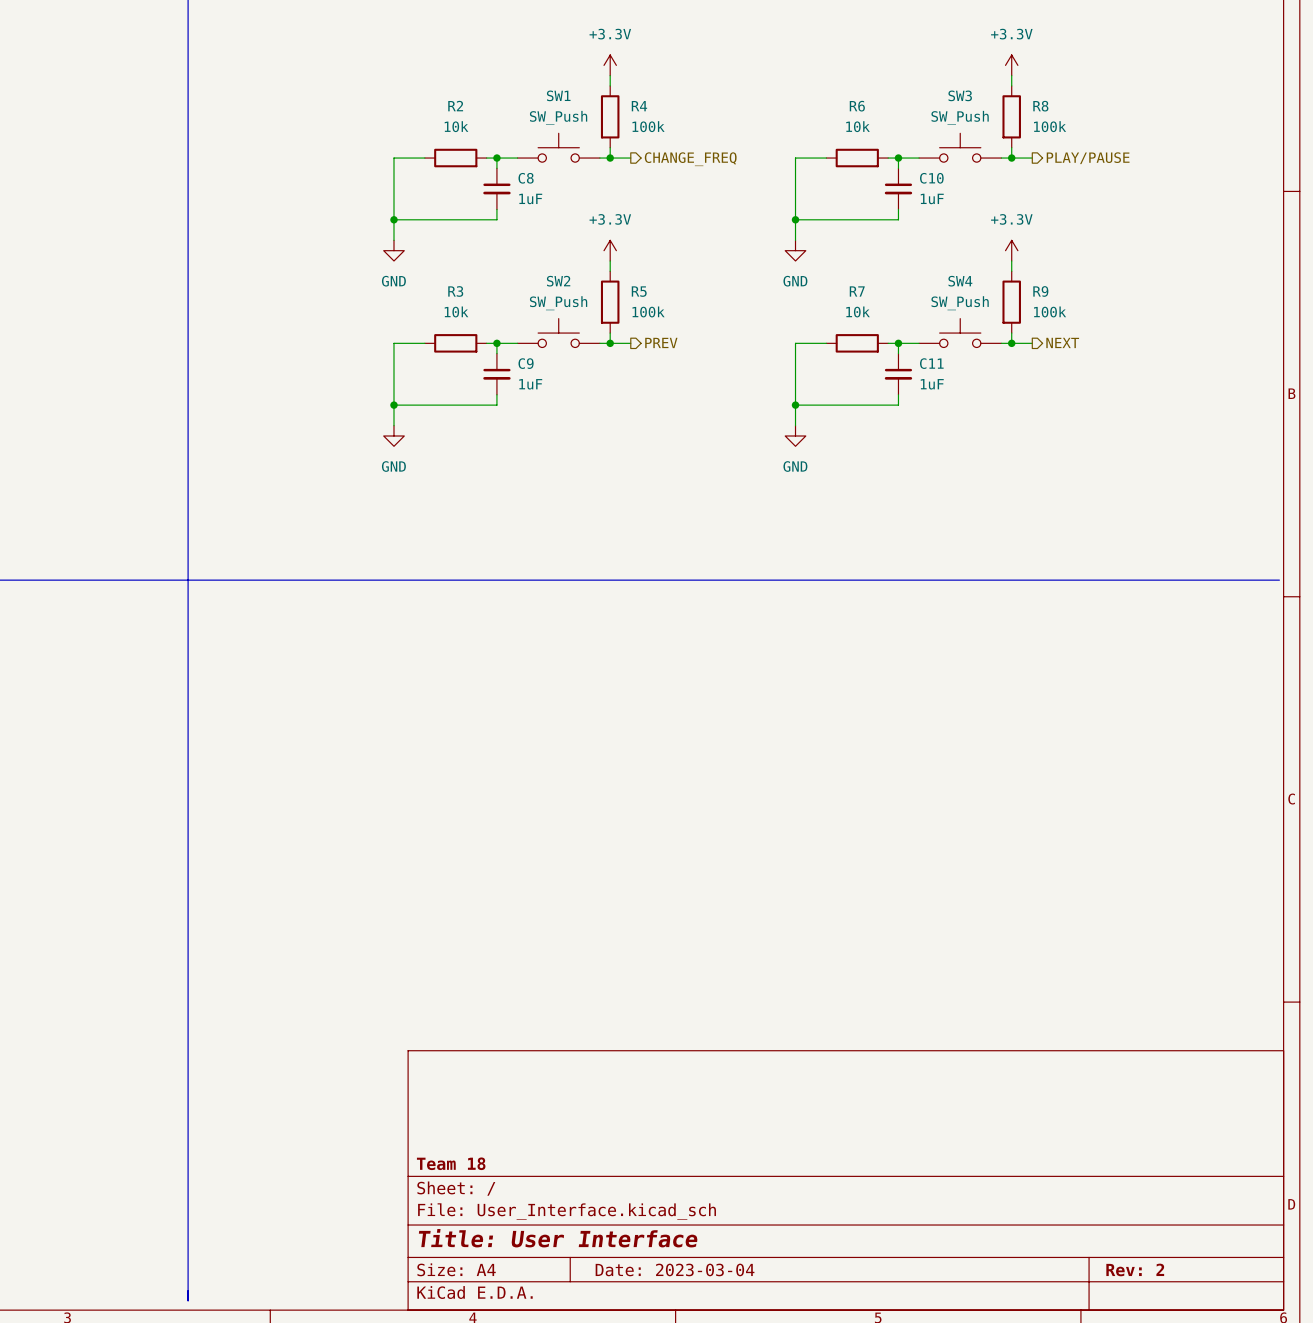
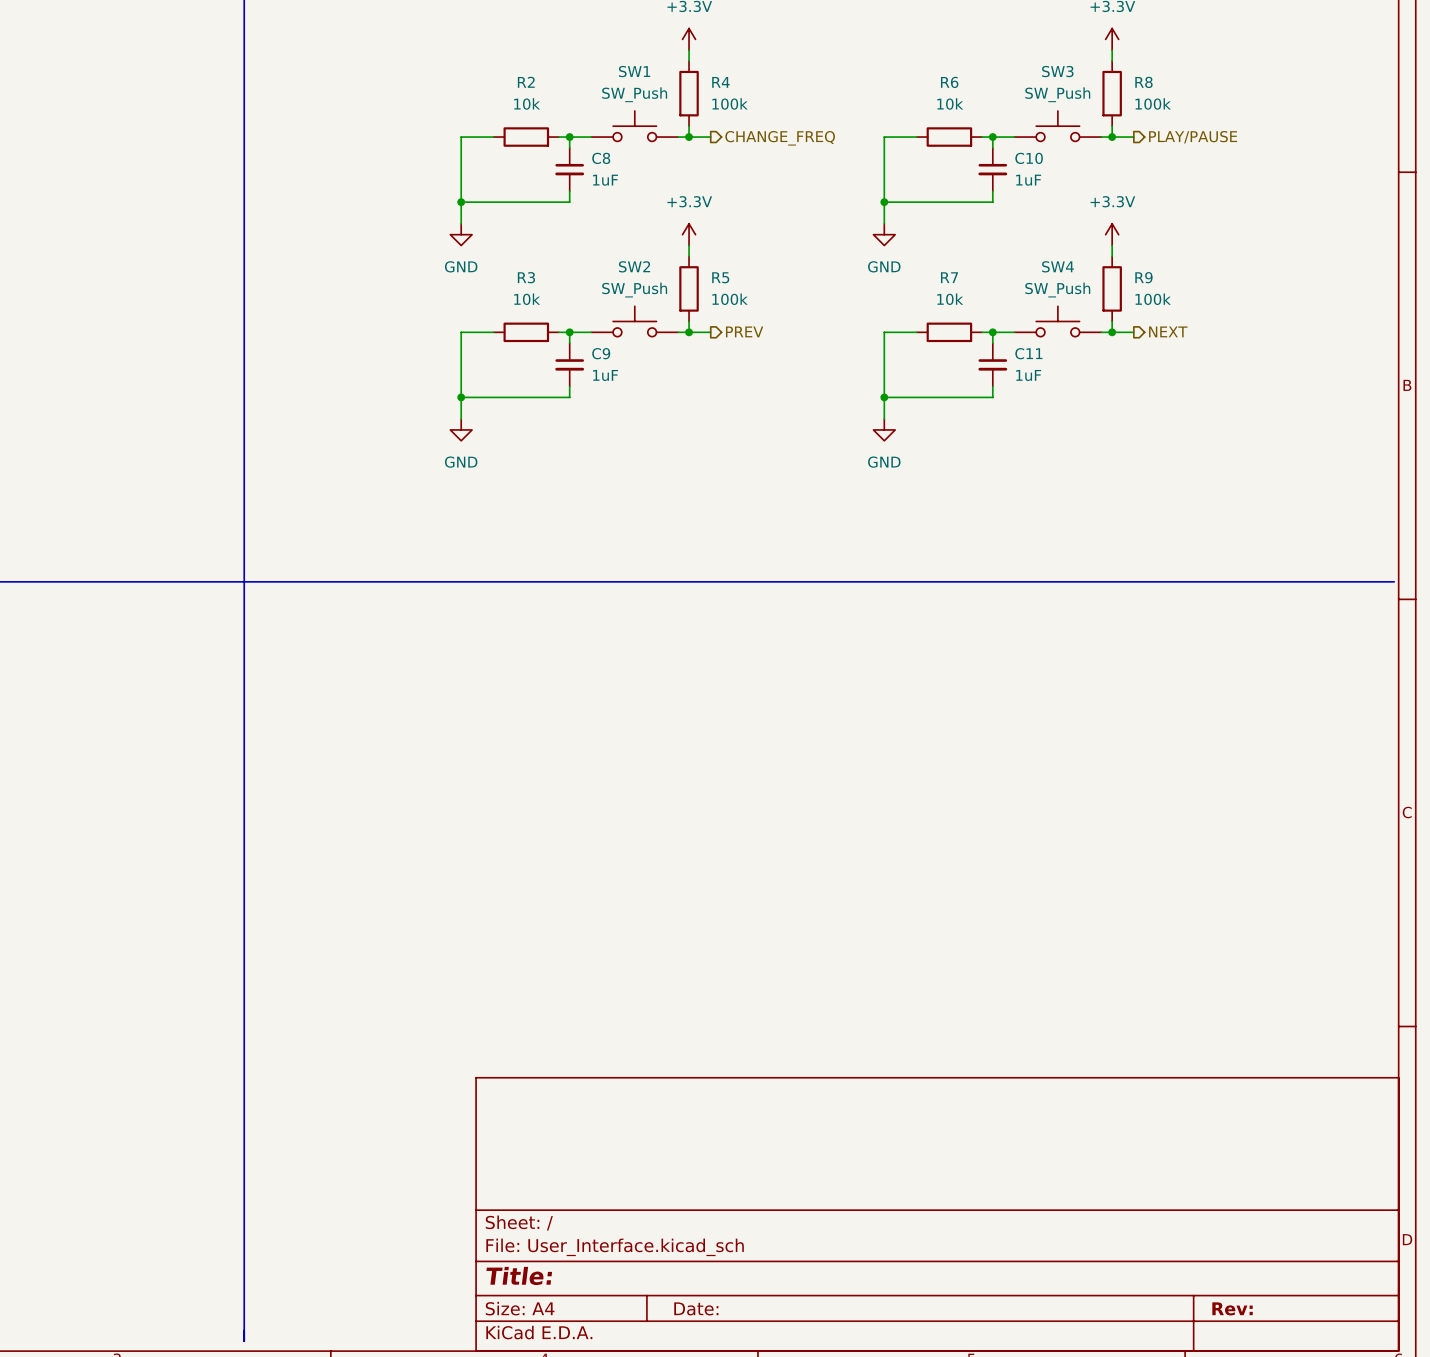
title block: Team 18 (451, 1163) -> none
title block: Title: User Interface (558, 1238) -> Title: (519, 1275)
title block: Date: 2023-03-04 (675, 1269) -> Date: (696, 1308)
title block: Rev: 2 (1135, 1269) -> Rev: (1232, 1308)

